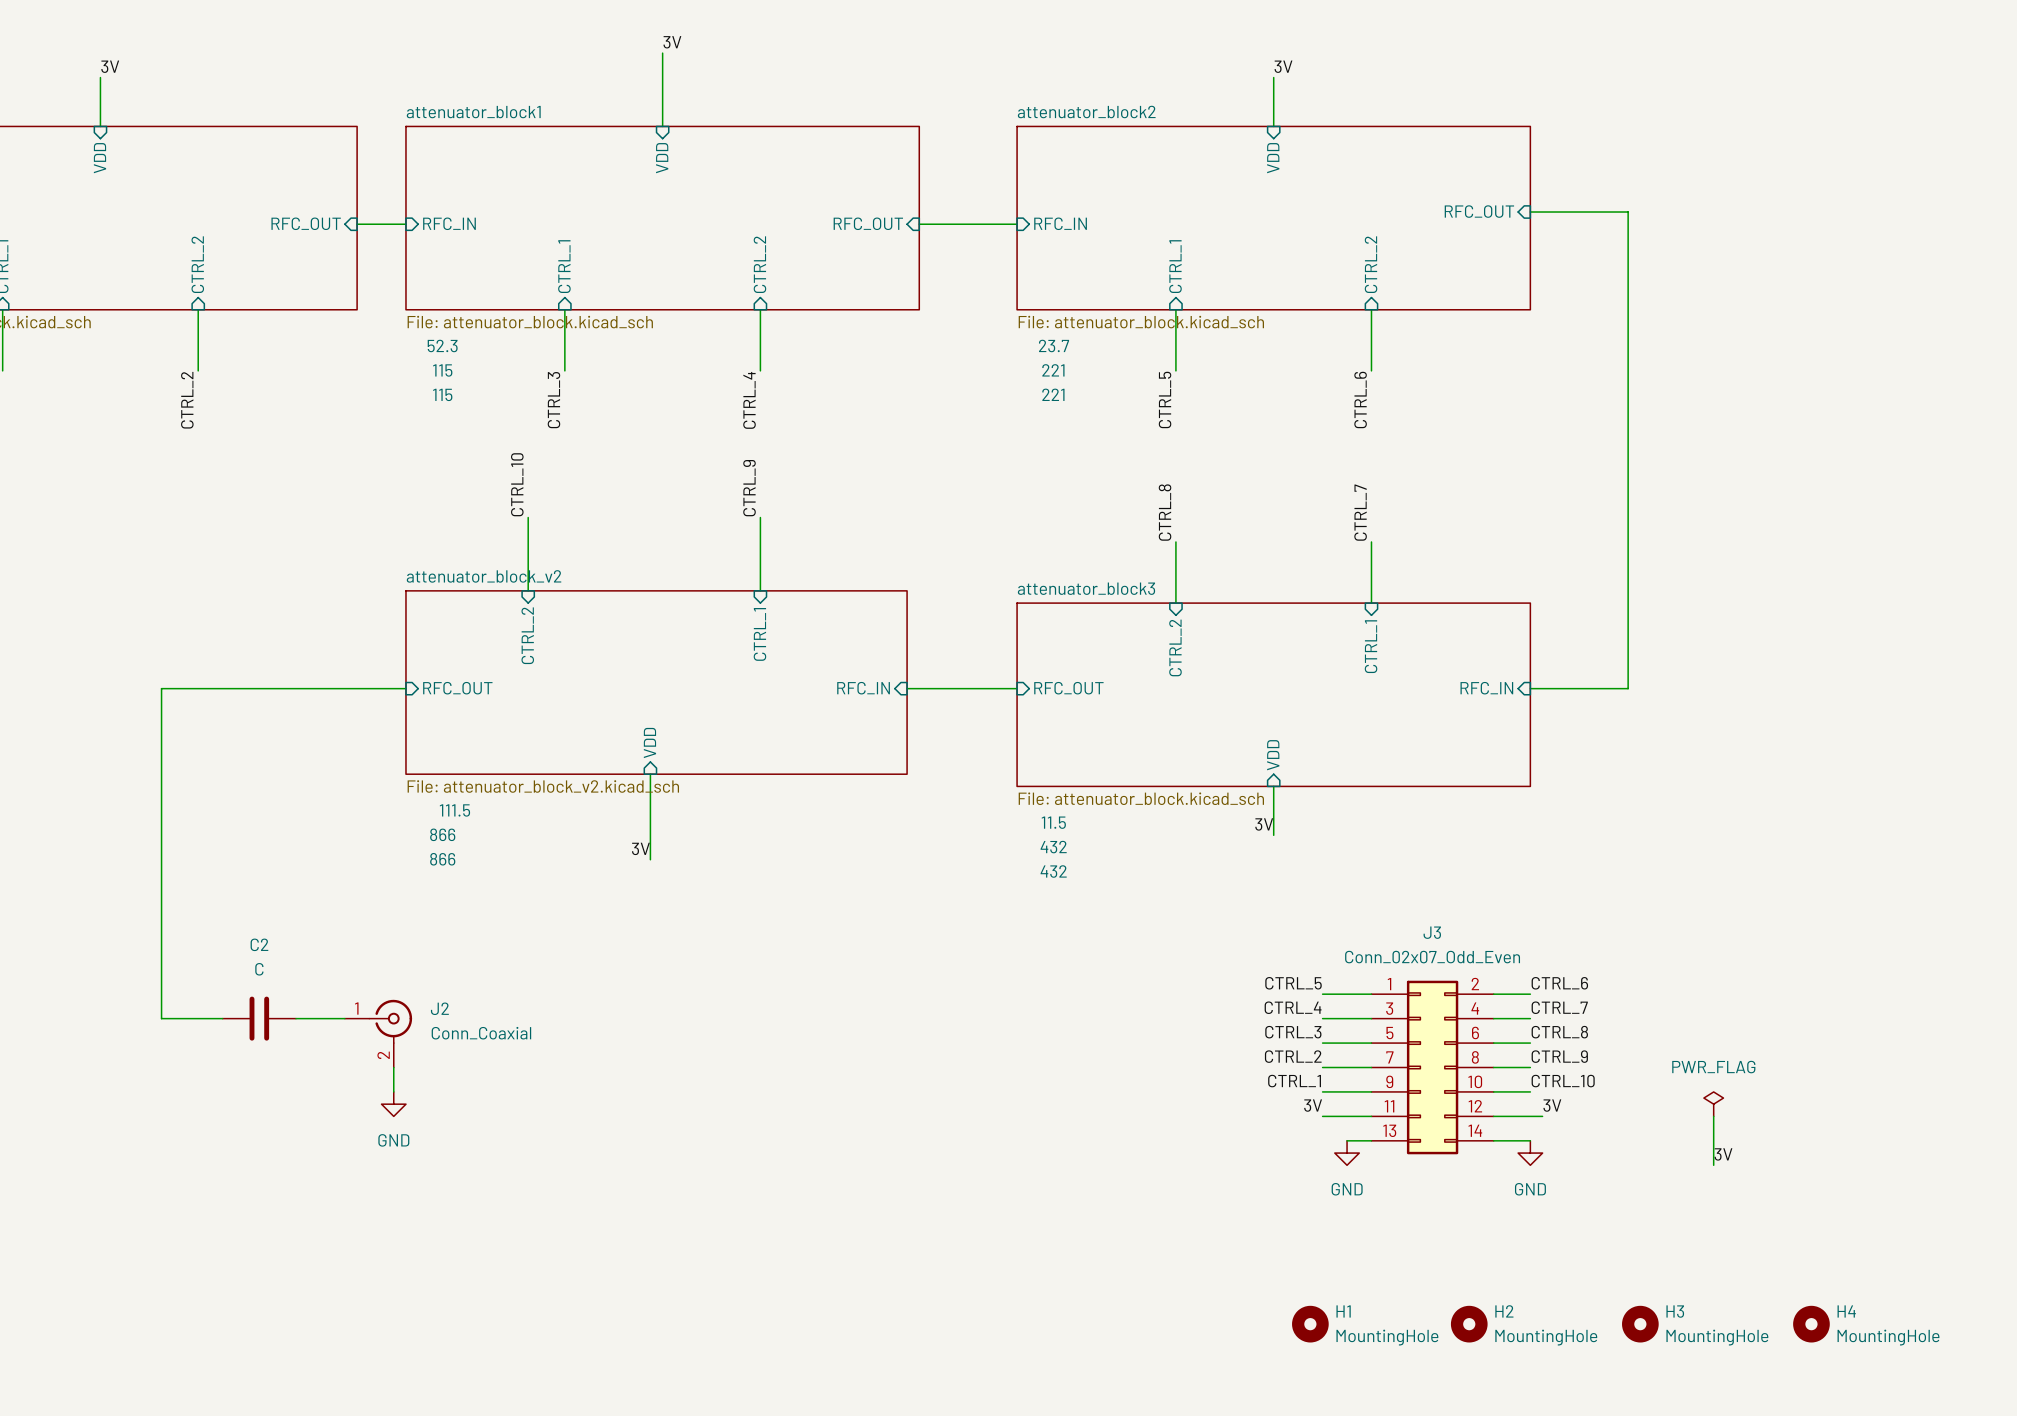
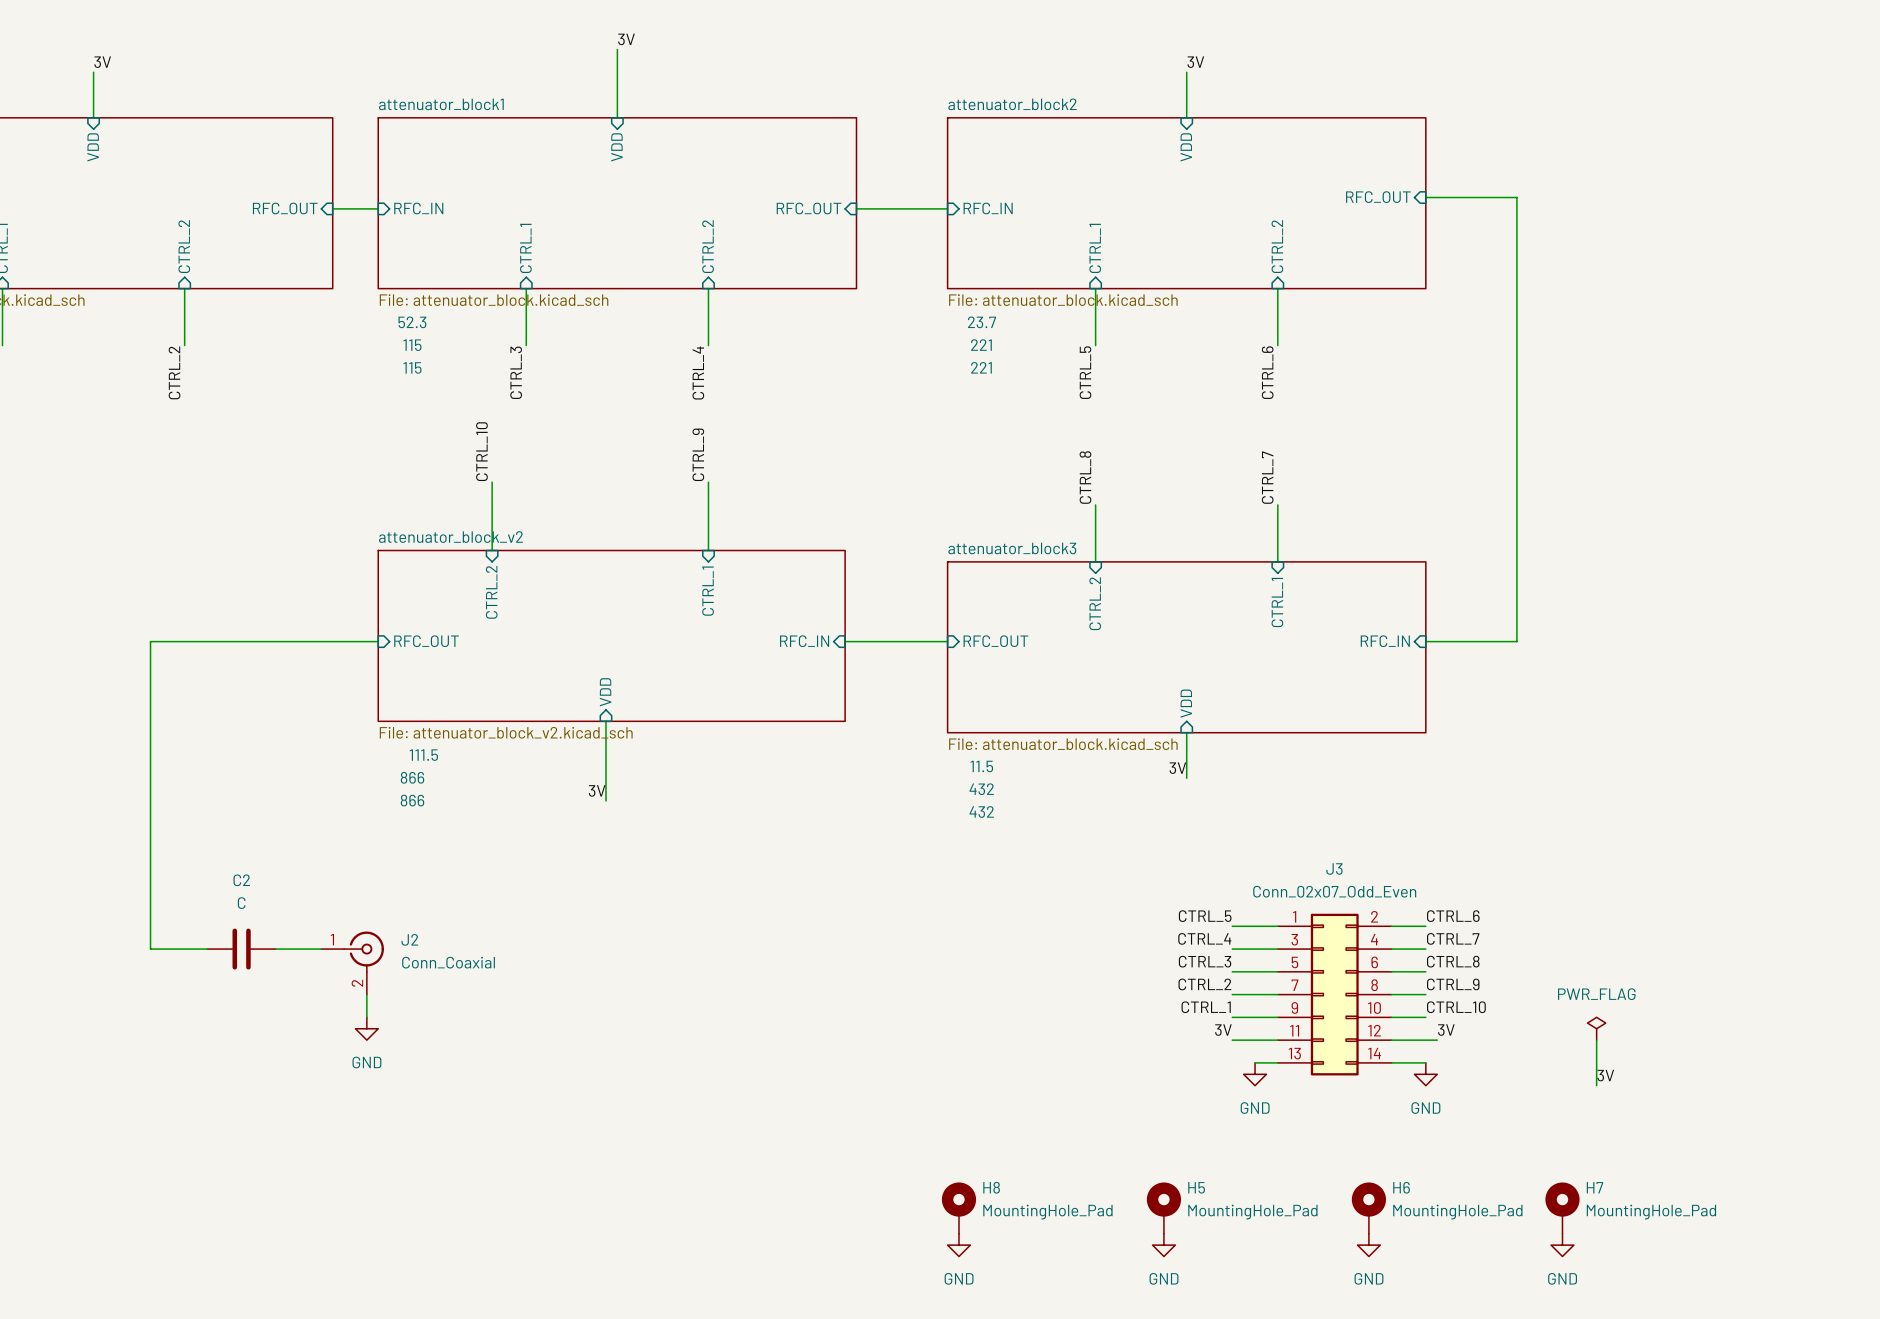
H8: none -> MountingHole_Pad (958, 1208)
H5: none -> MountingHole_Pad (1163, 1208)
H6: none -> MountingHole_Pad (1368, 1208)
H7: none -> MountingHole_Pad (1562, 1208)
H1: MountingHole (1310, 1324) -> none
H2: MountingHole (1469, 1324) -> none
H3: MountingHole (1640, 1324) -> none
H4: MountingHole (1811, 1324) -> none
power symbol: none -> GND (958, 1245)
power symbol: none -> GND (1163, 1245)
power symbol: none -> GND (1368, 1245)
power symbol: none -> GND (1562, 1245)

